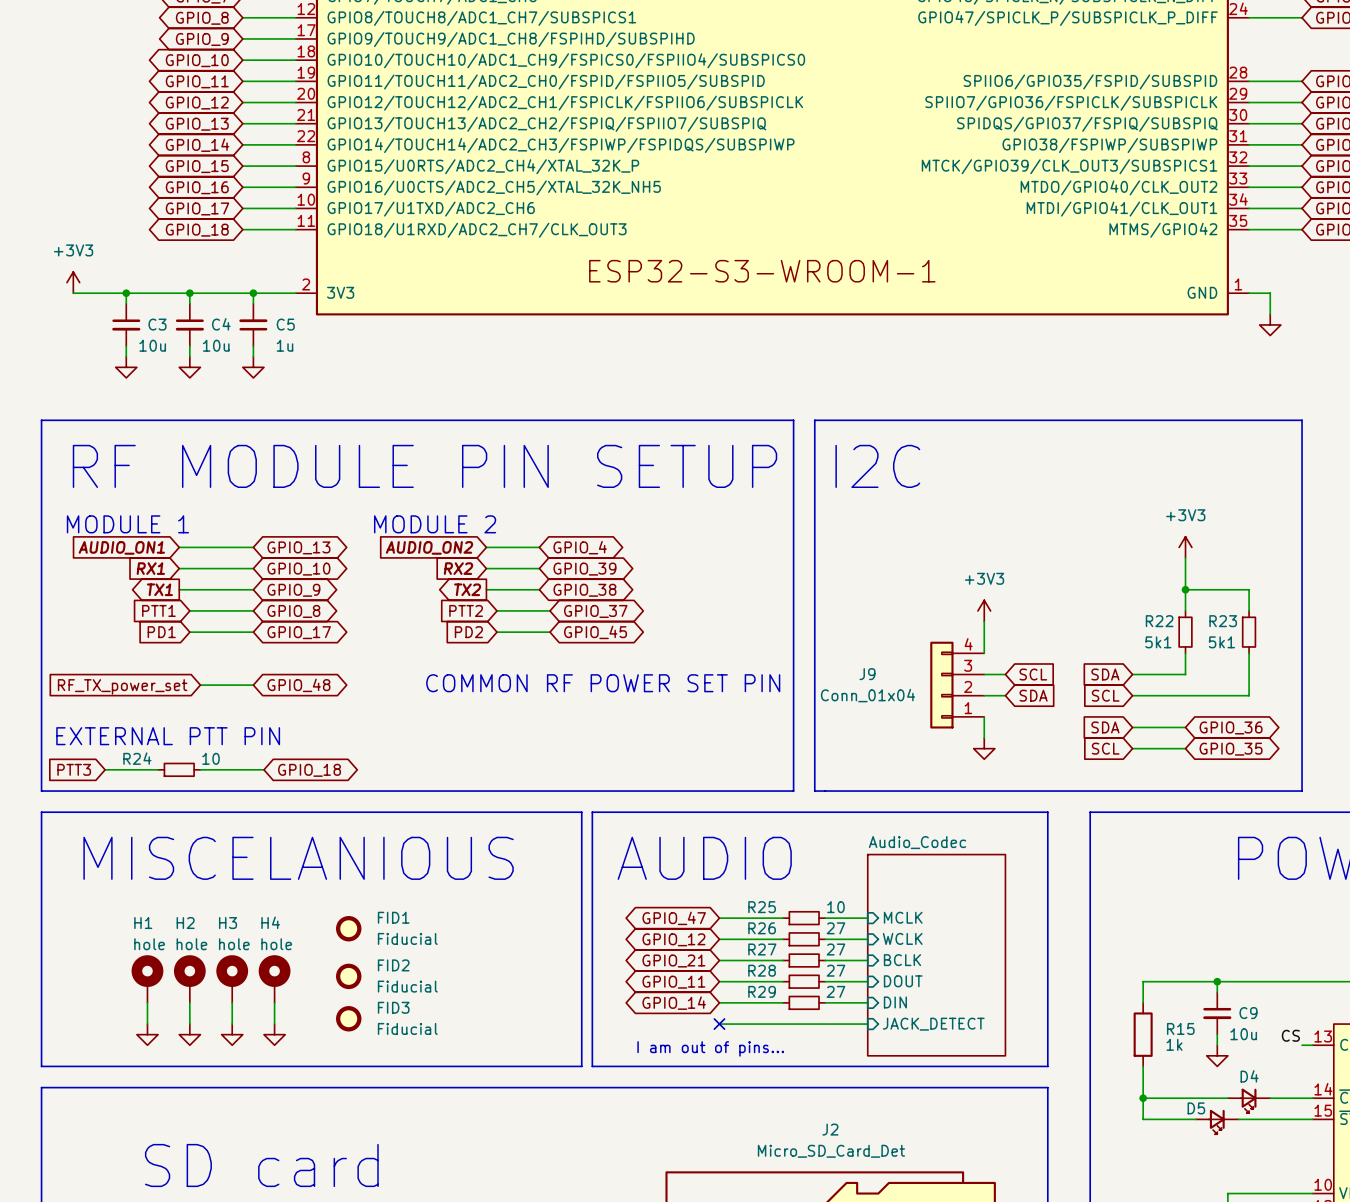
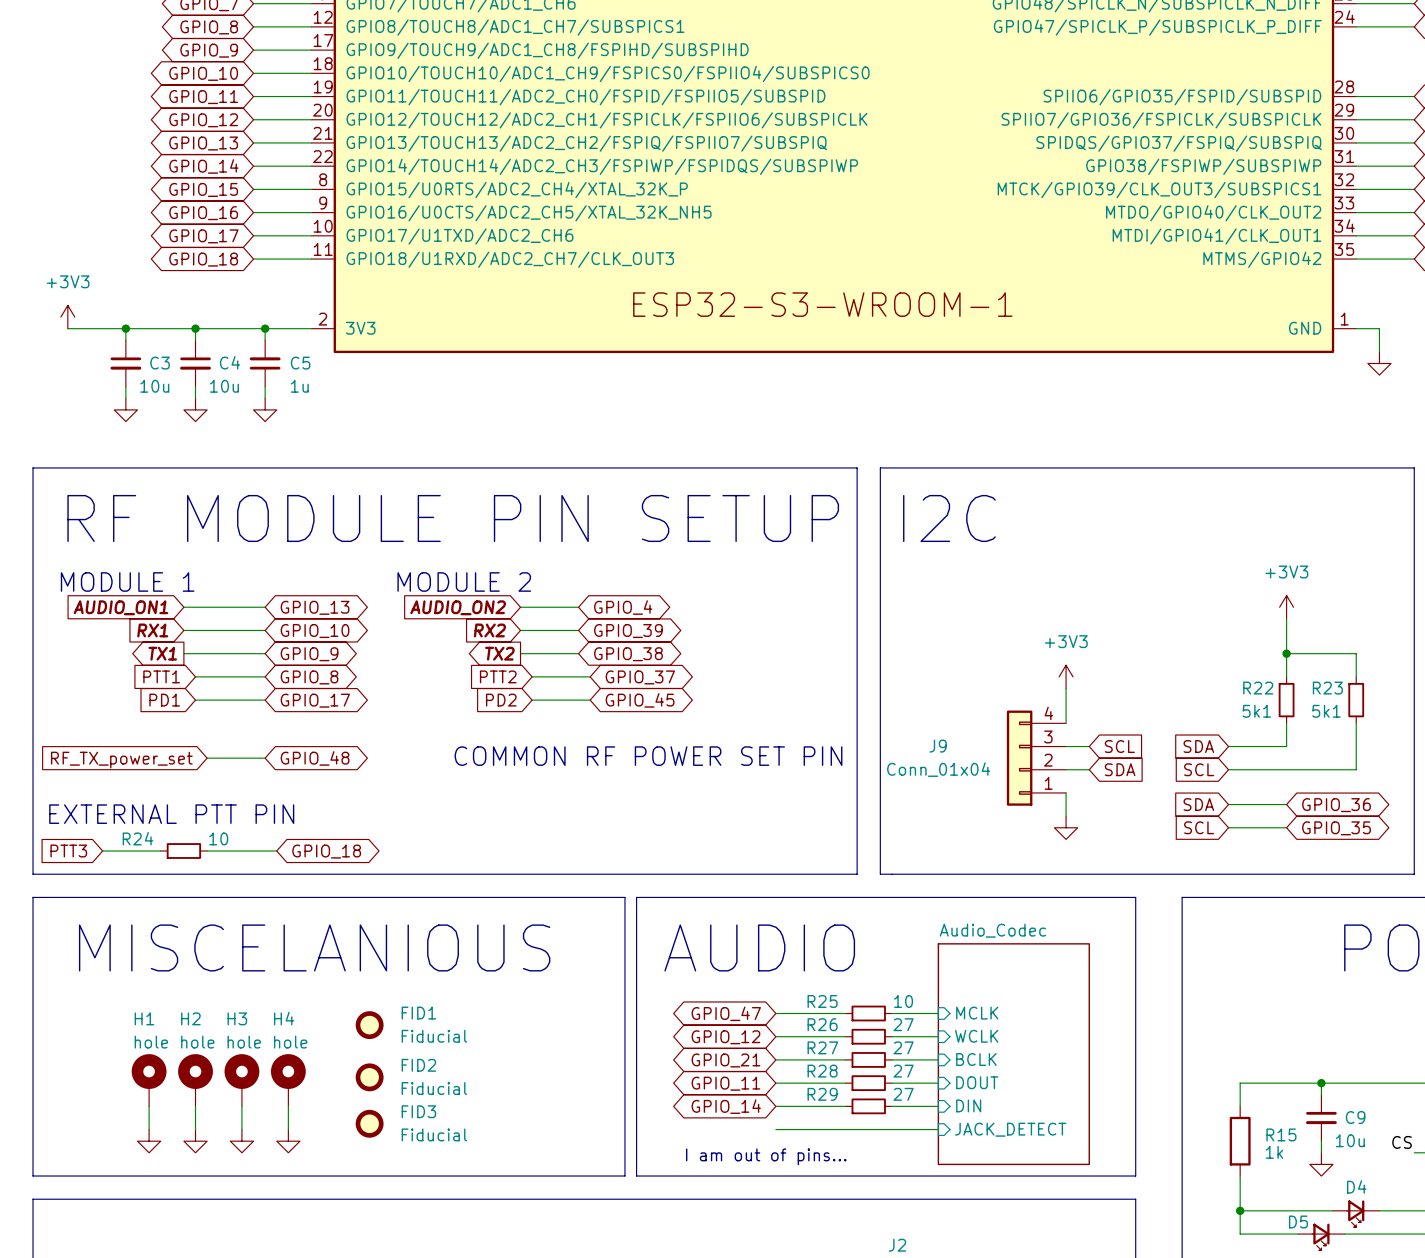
no-connect mark: (719, 1024) -> none

